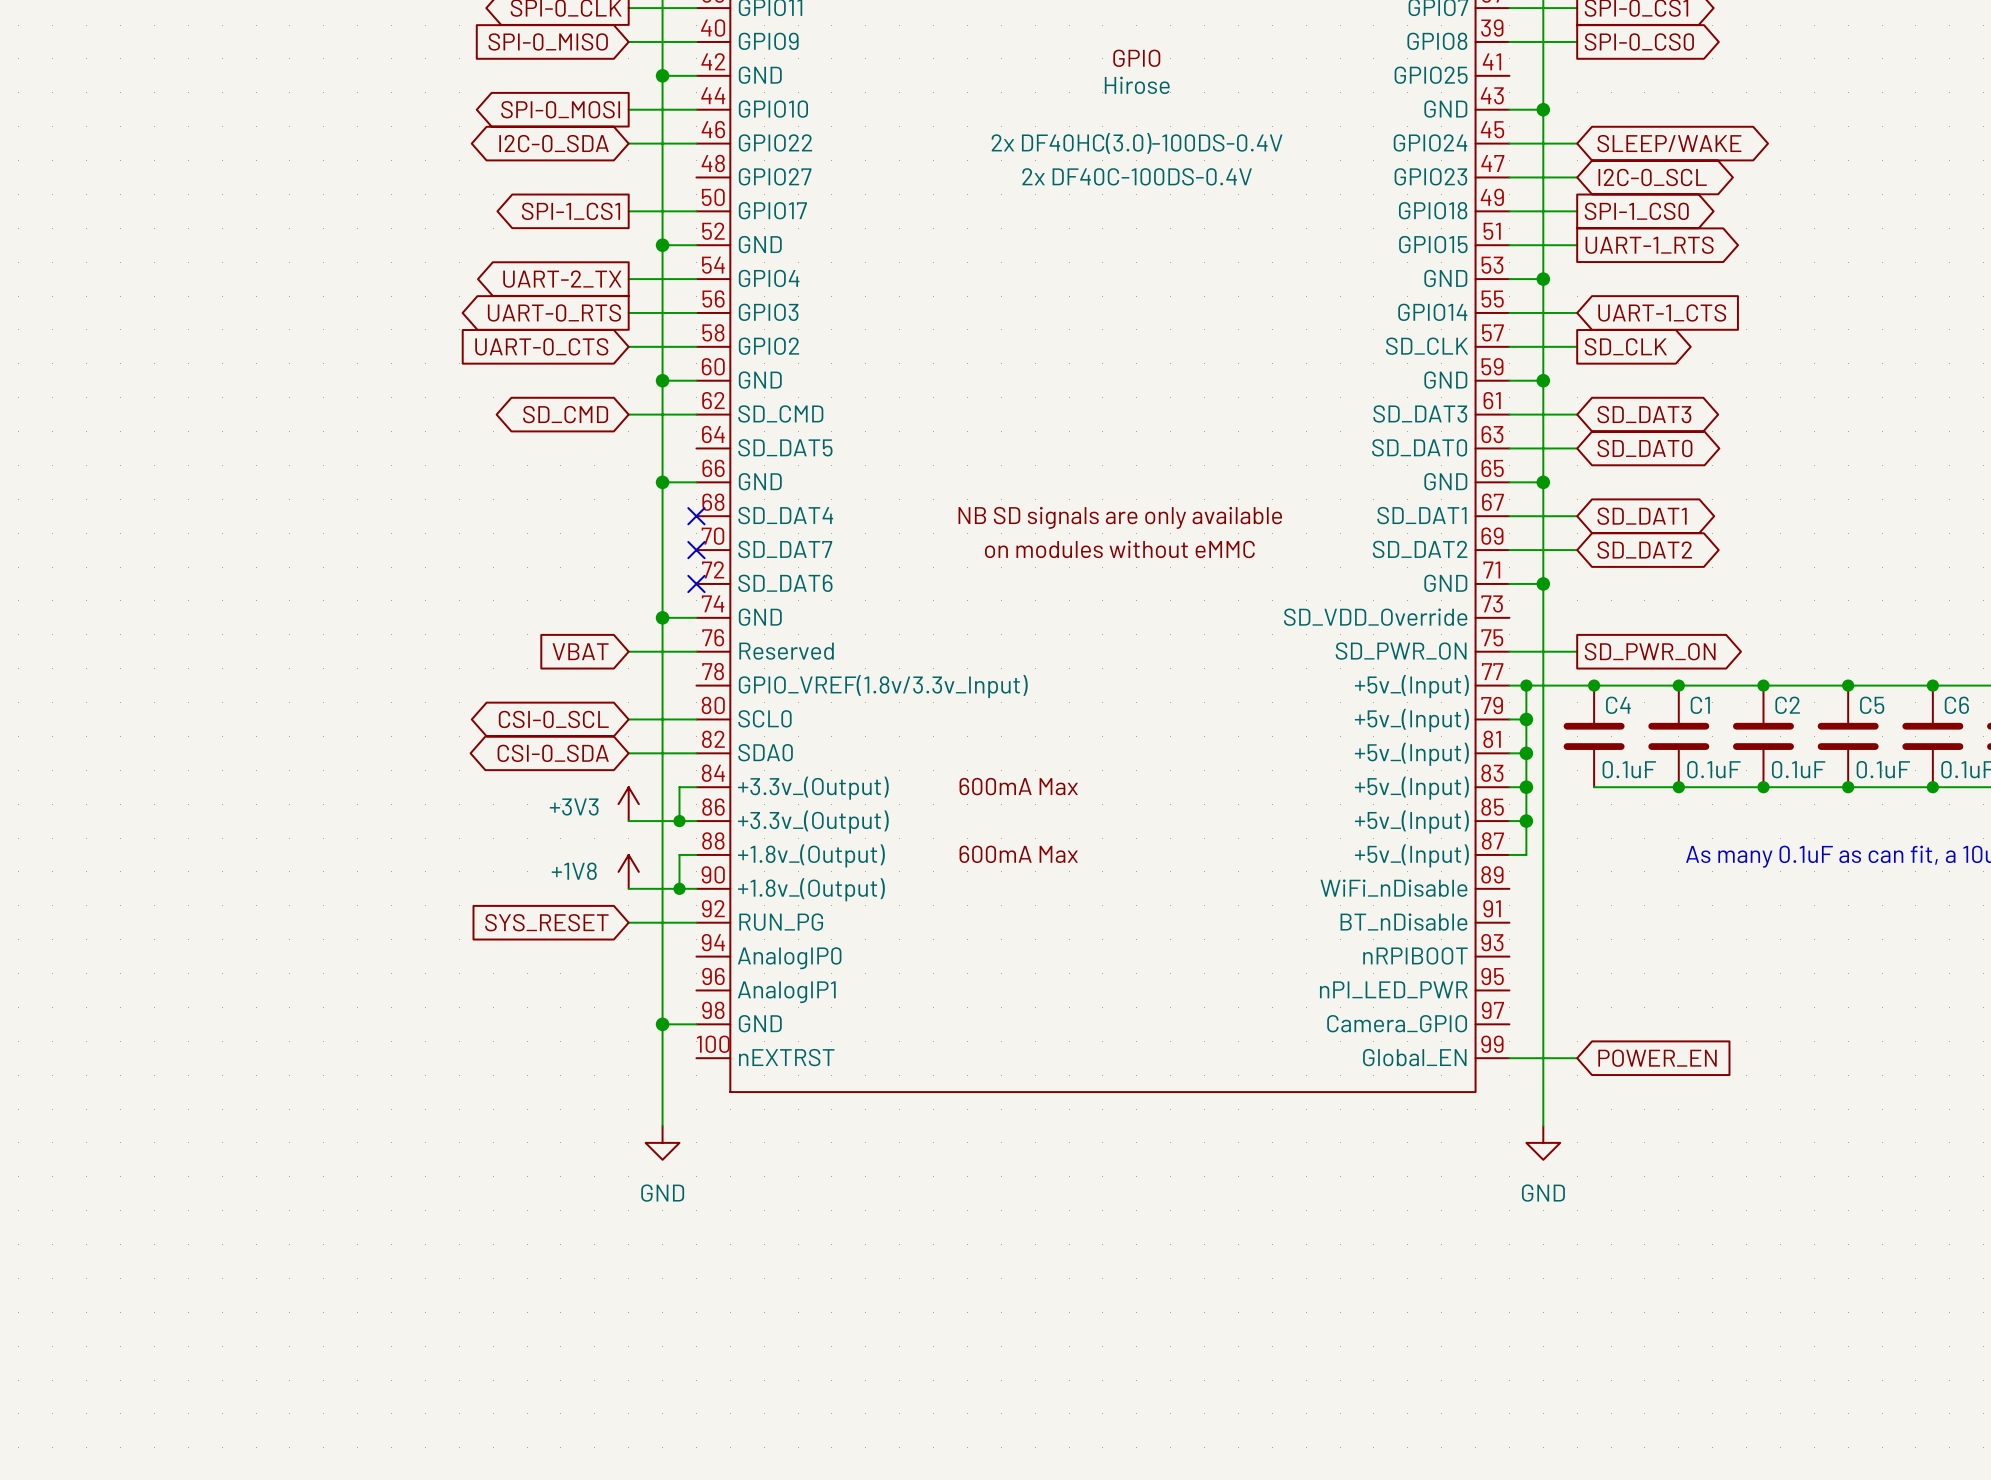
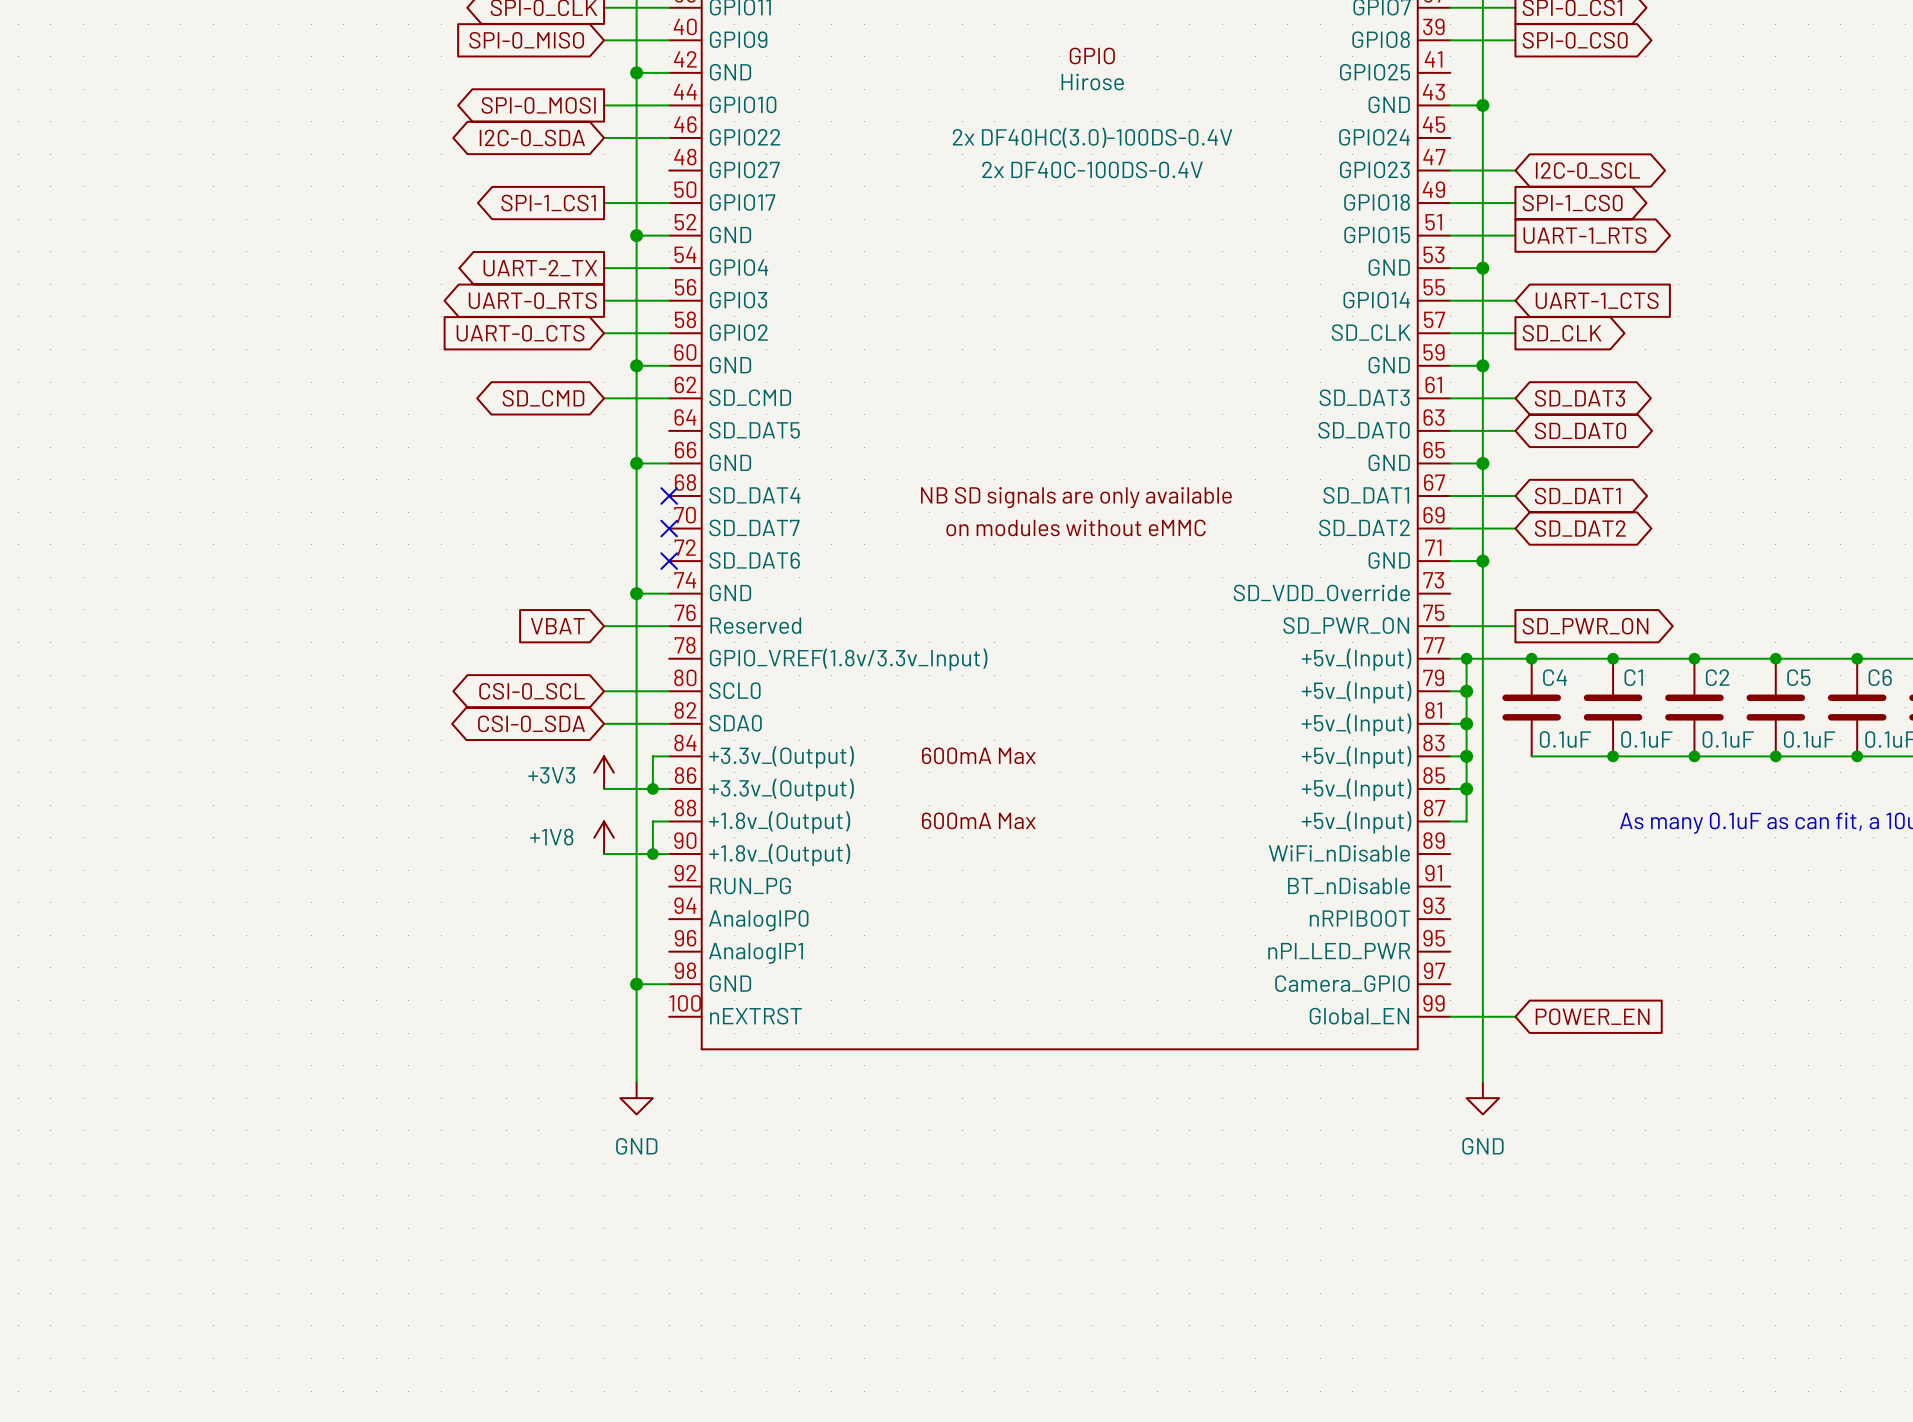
wire: (1509, 143) (1577, 143) -> none
global label: SLEEP/WAKE (1669, 143) -> none
global label: SYS_RESET (546, 922) -> none
wire: (628, 922) (696, 922) -> none

